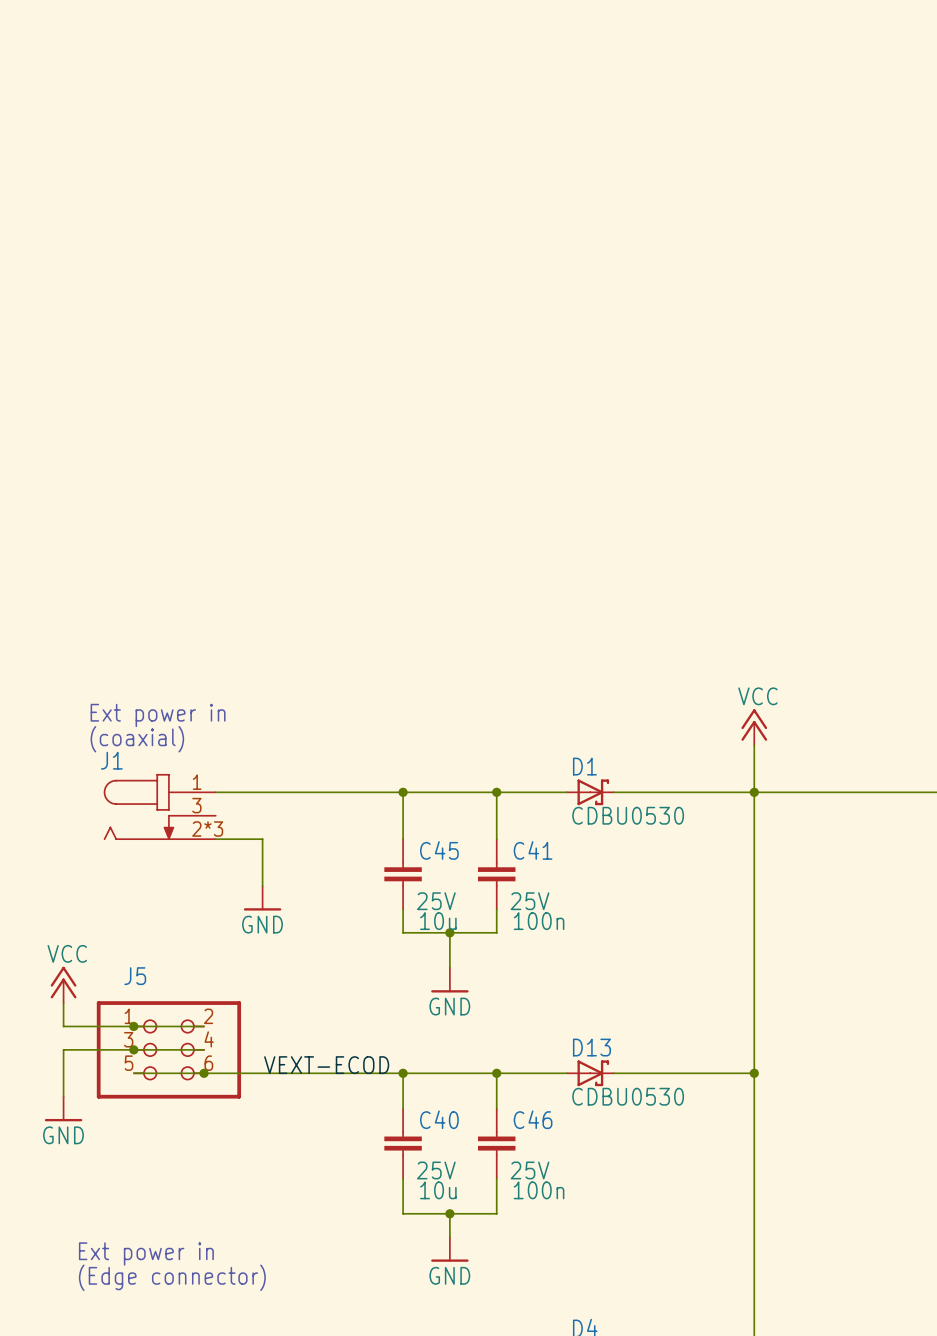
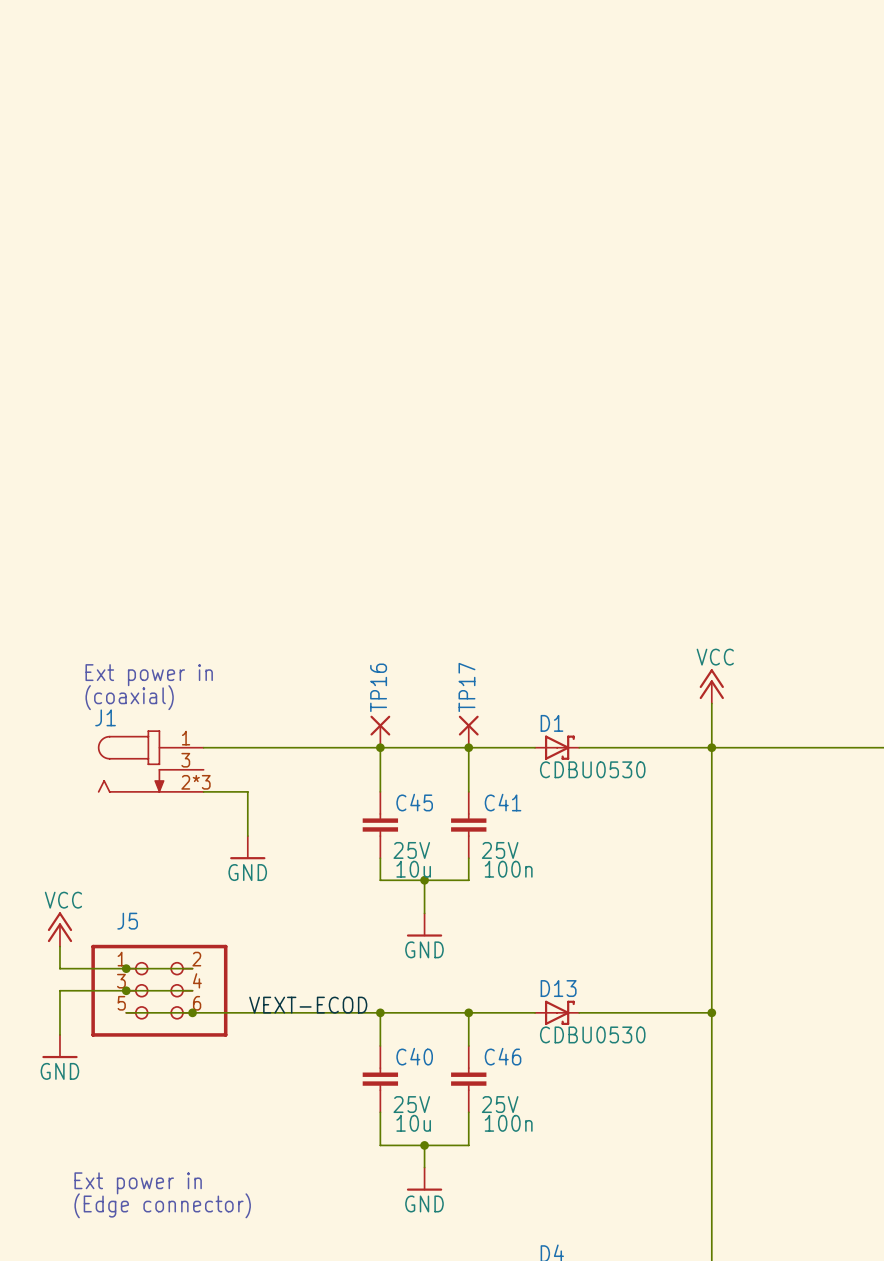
TP16: none -> (380, 731)
TP17: none -> (468, 731)

